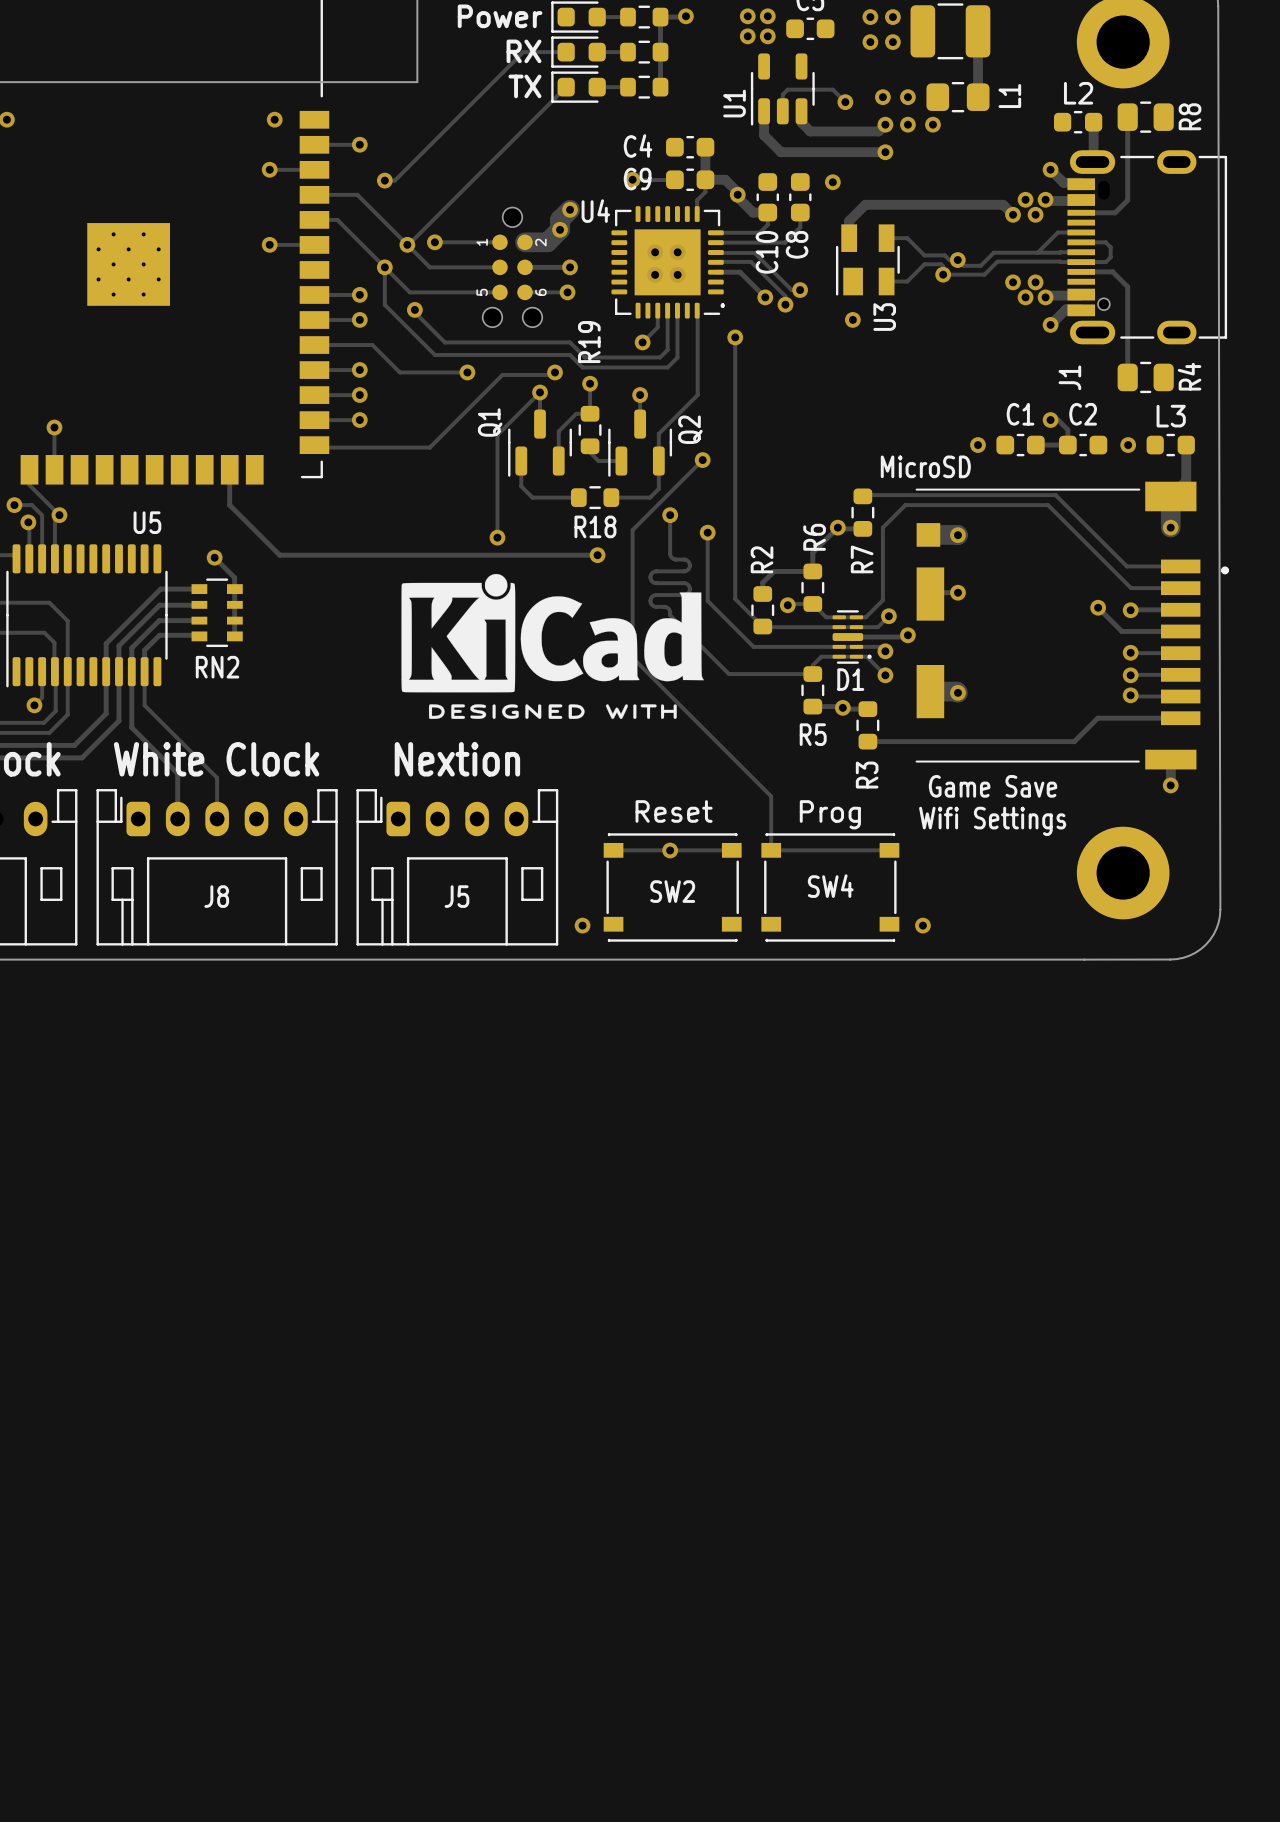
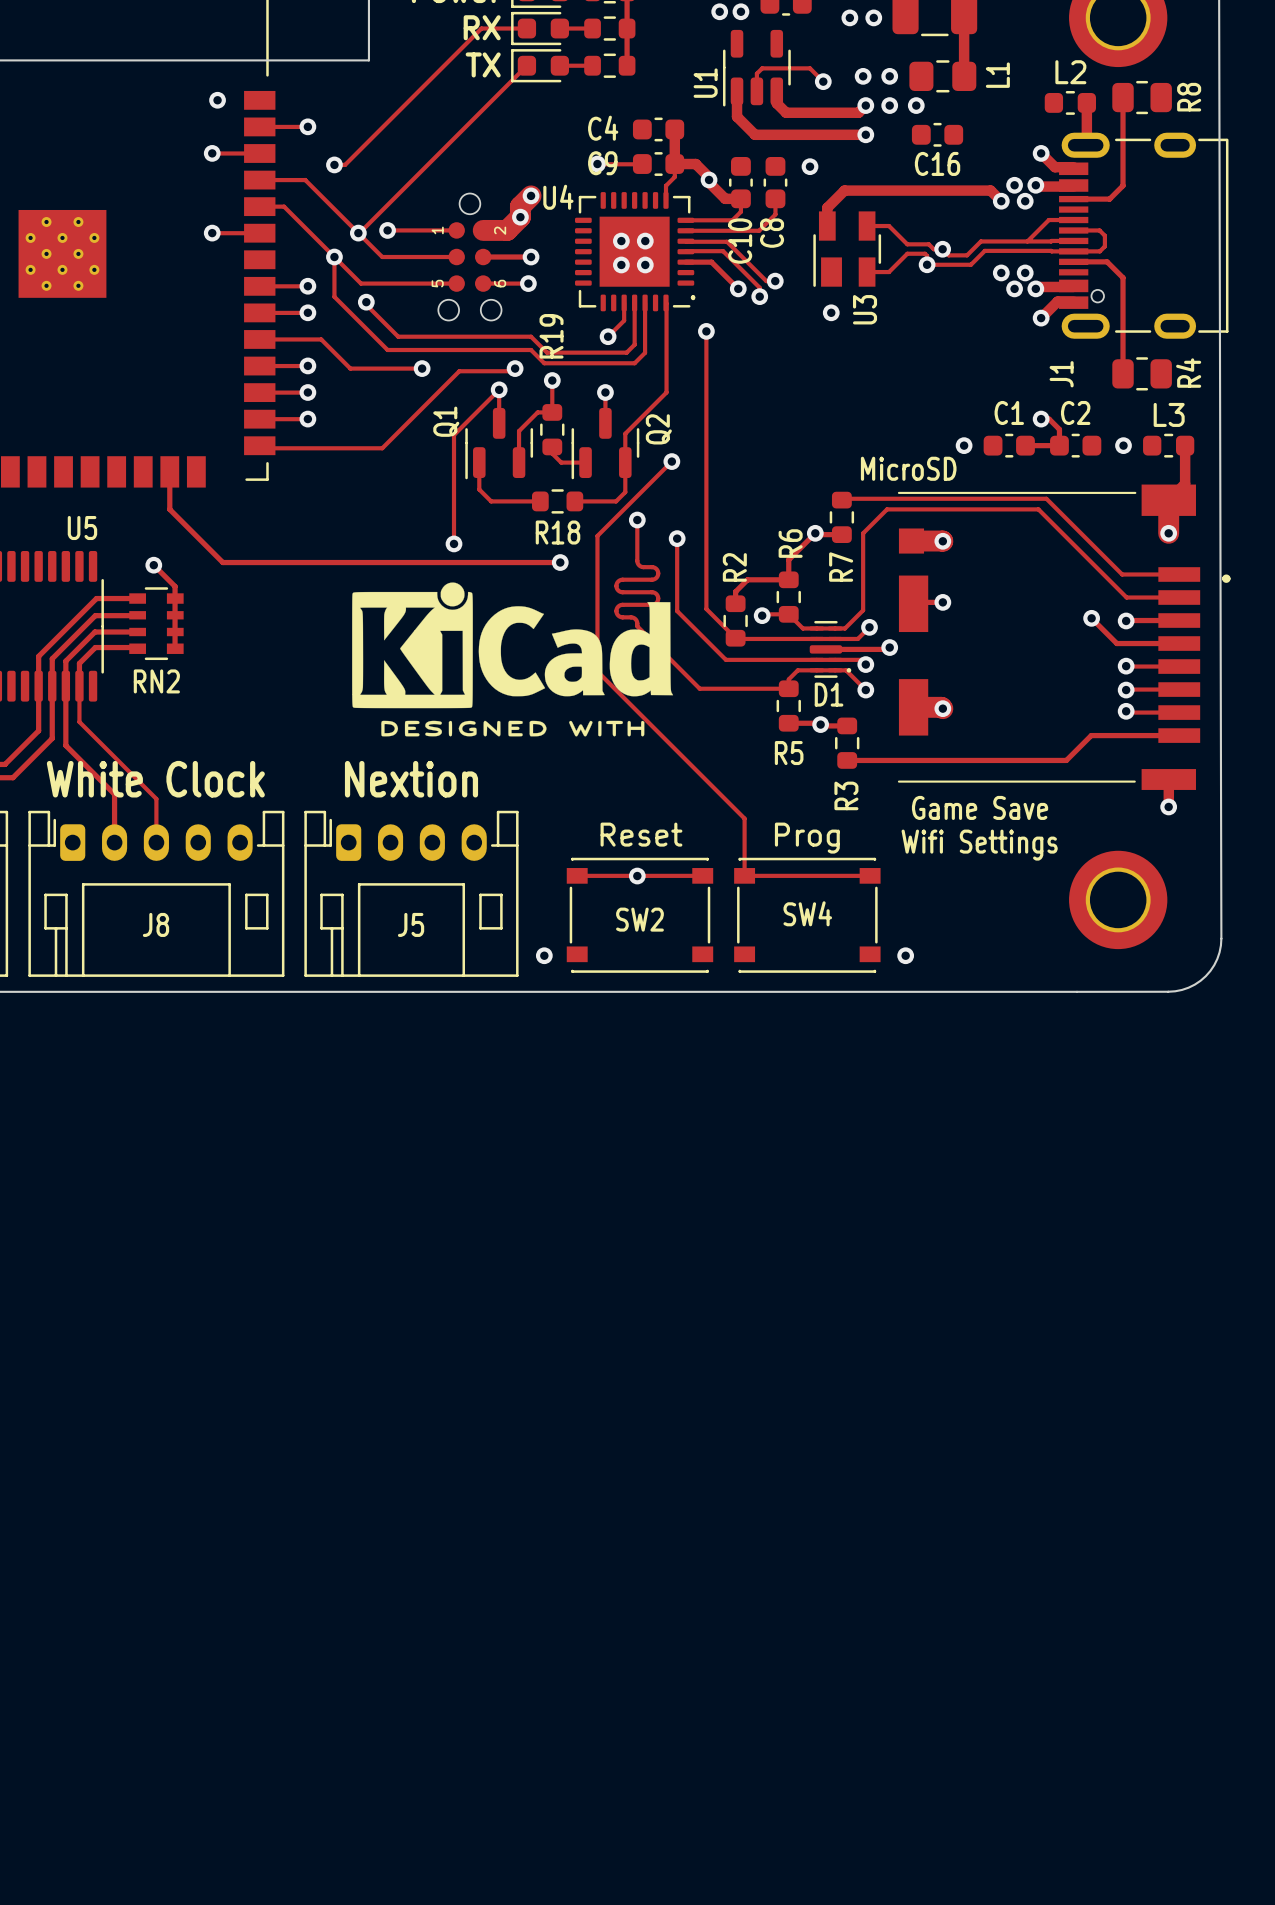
C16: none -> (937, 134)

